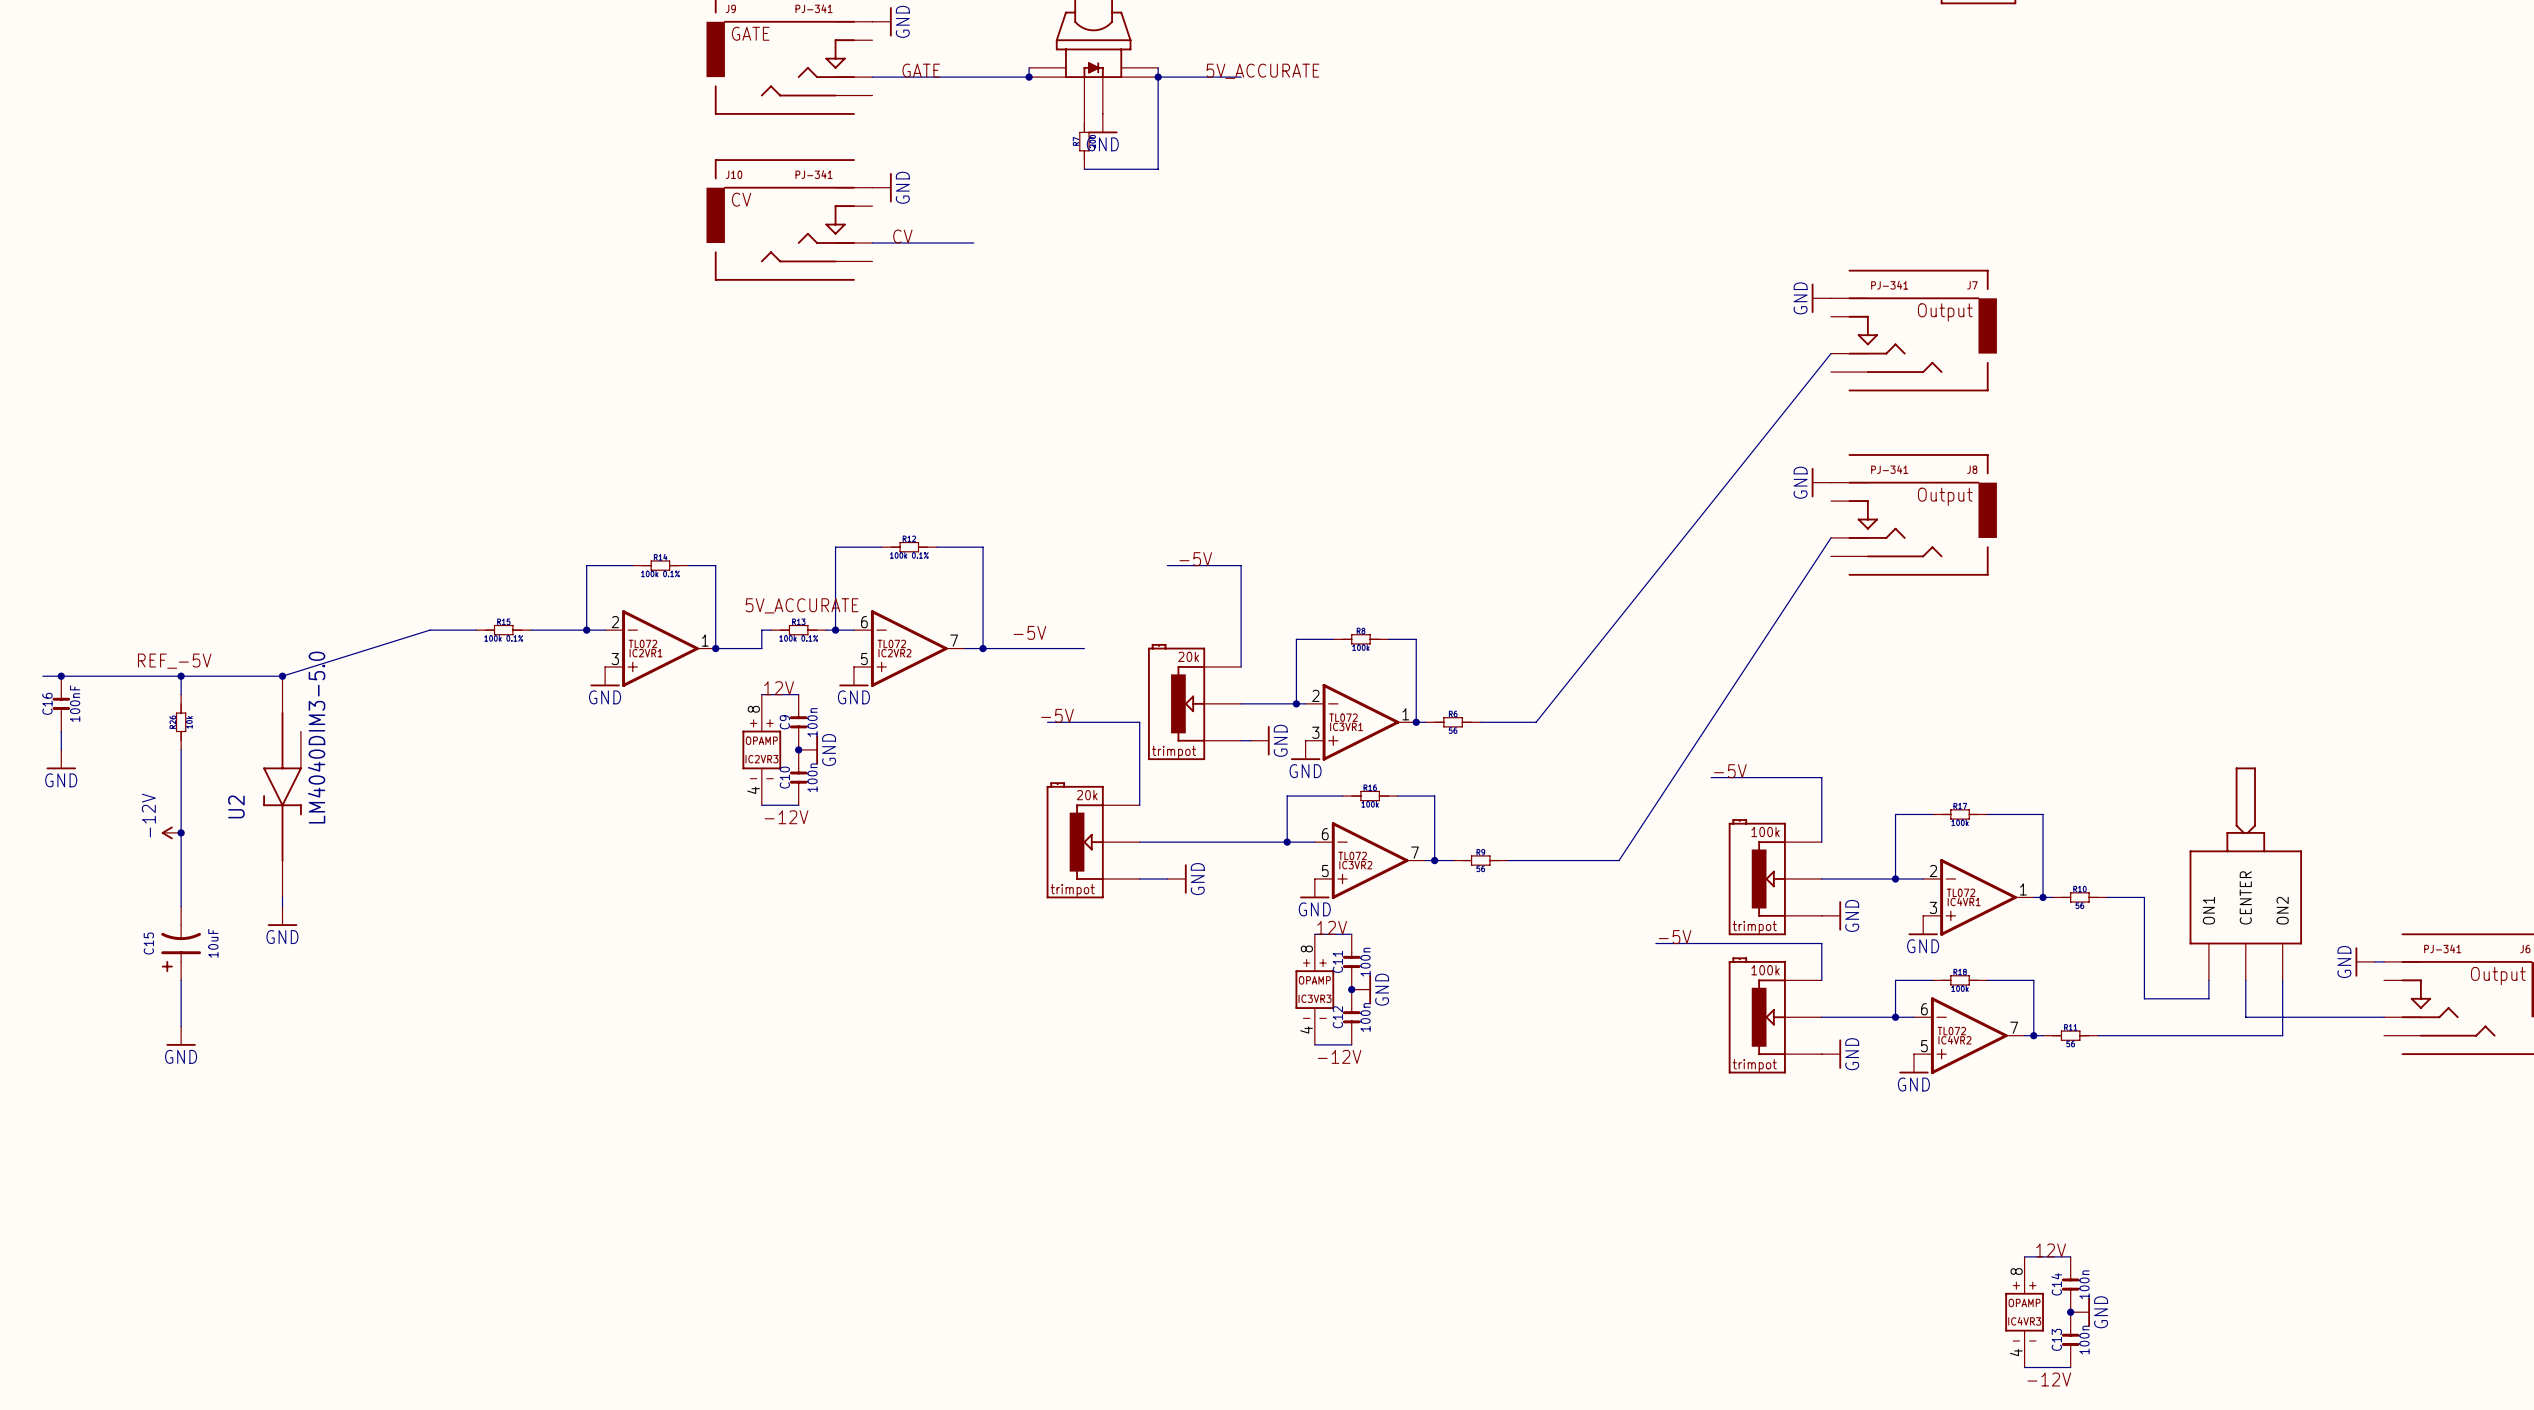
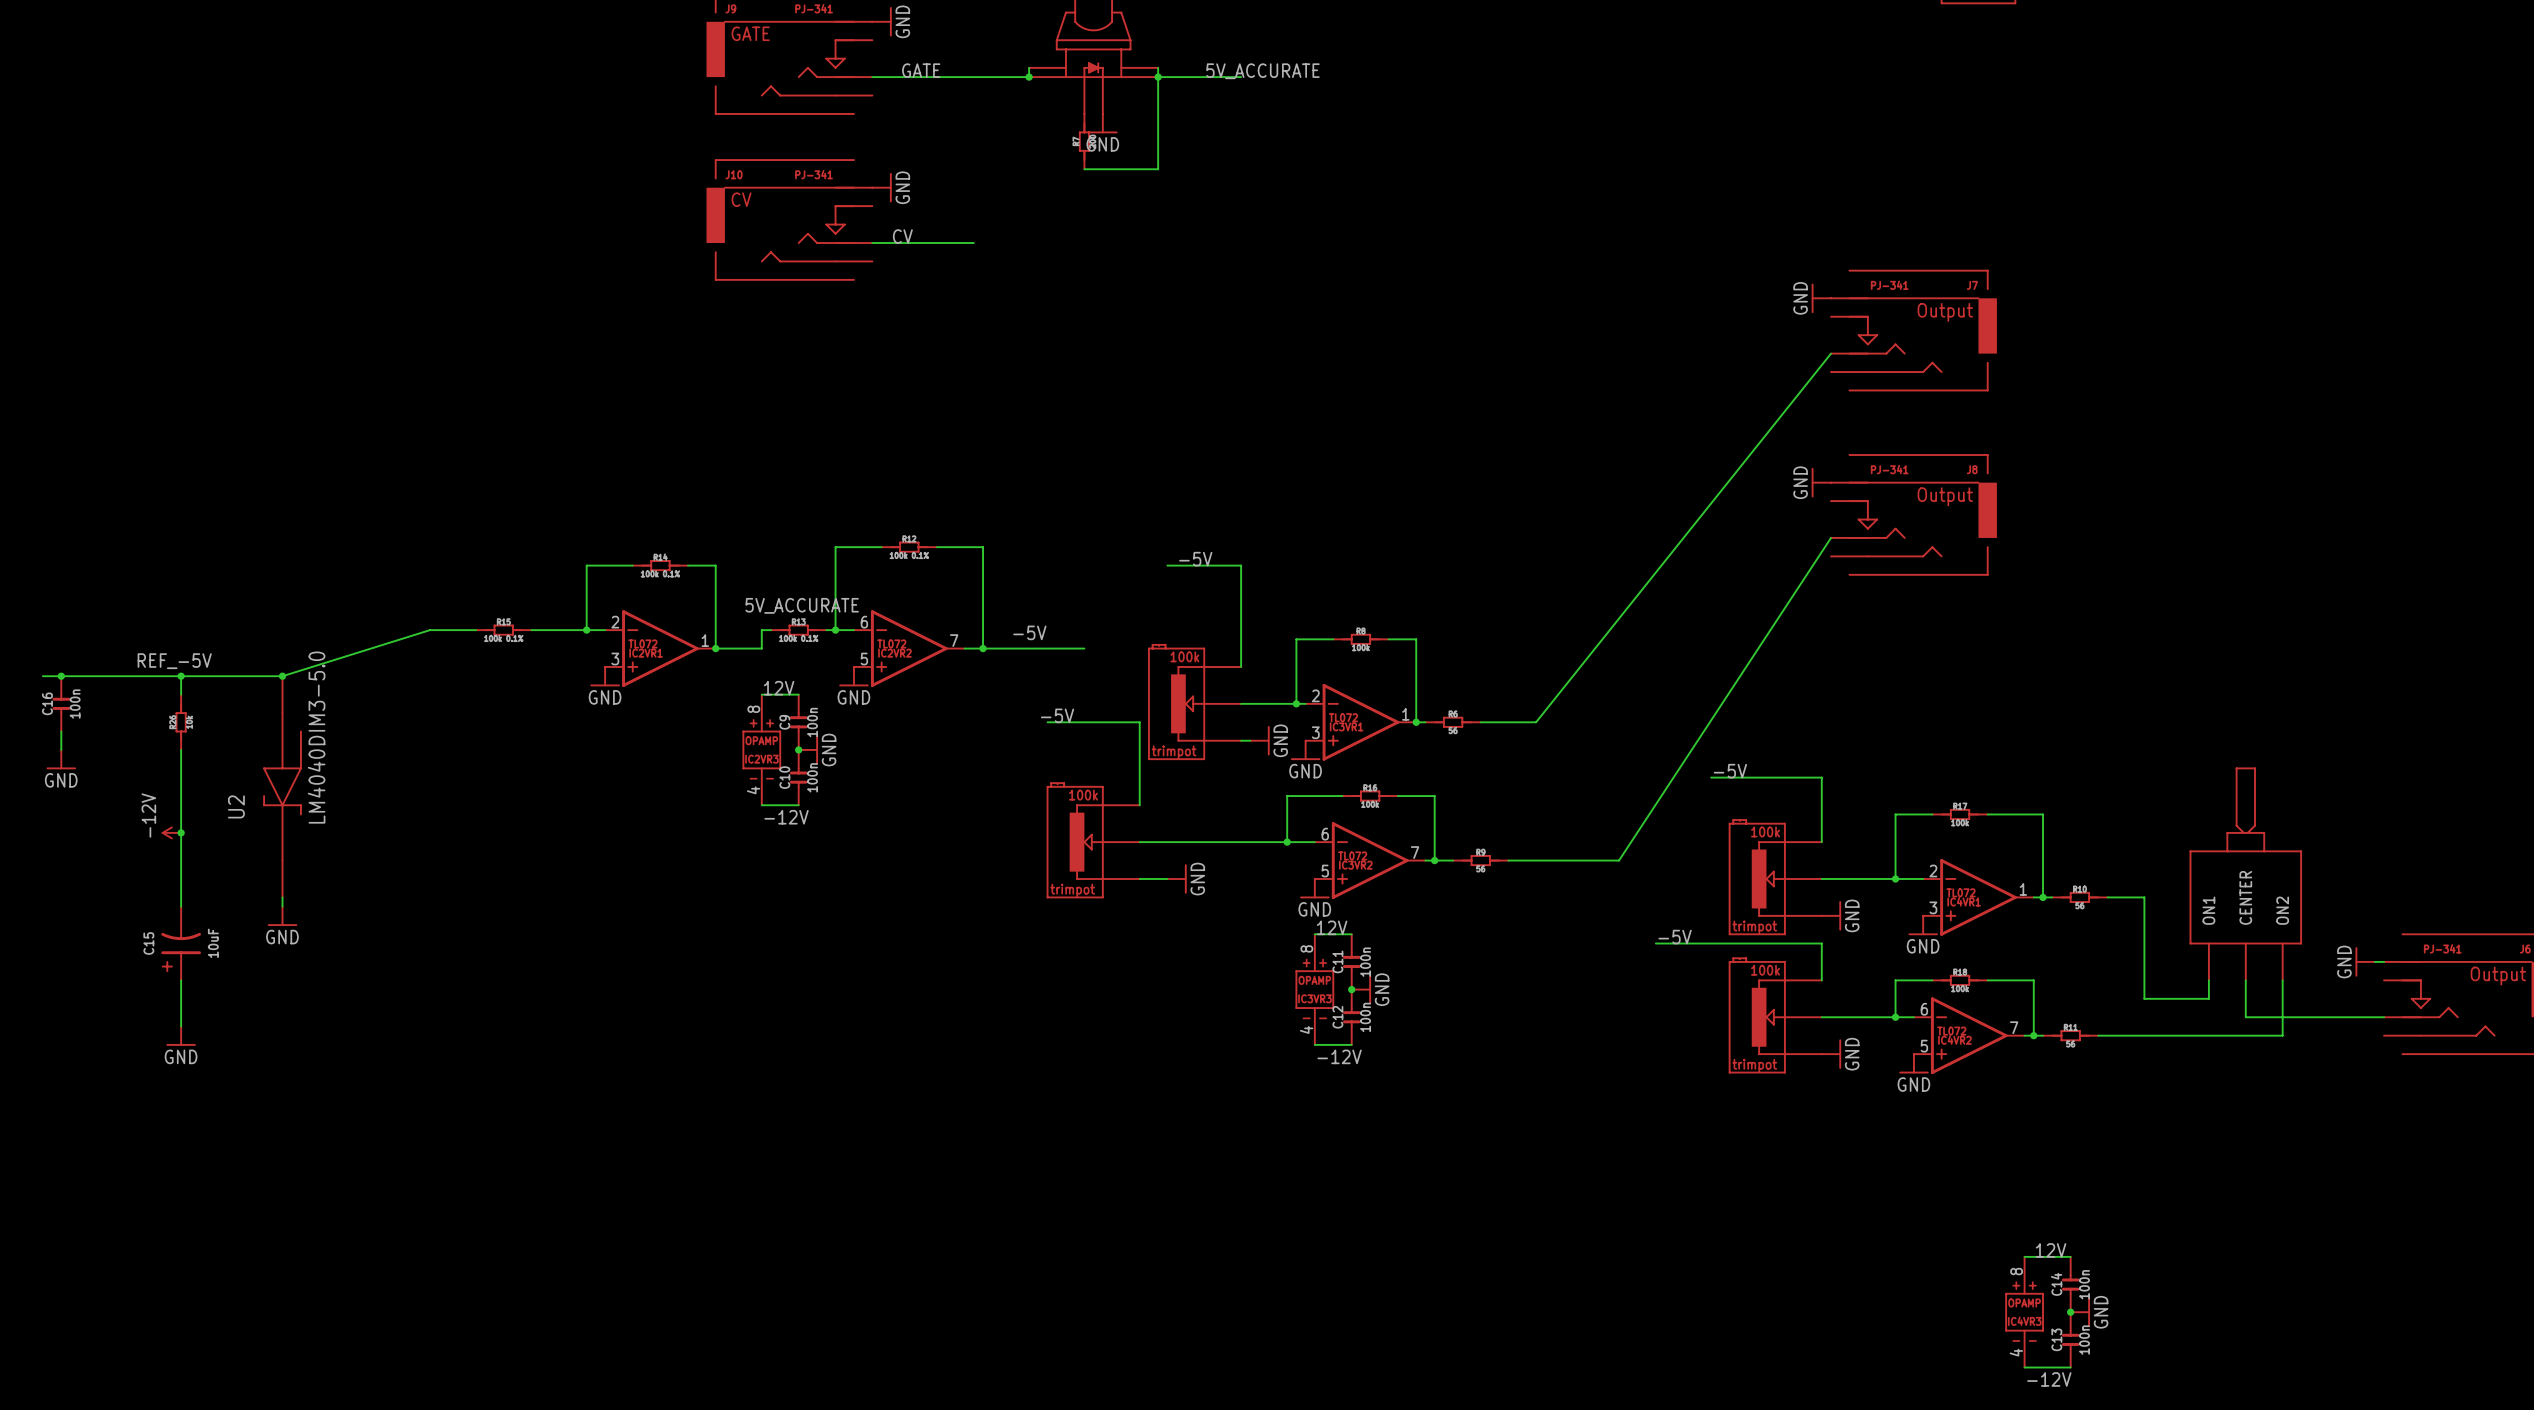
part value: 20k (1188, 656) -> 100k (1184, 656)
C16 value: 100nF (75, 703) -> 100n (75, 704)
part value: 20k (1087, 795) -> 100k (1083, 795)

